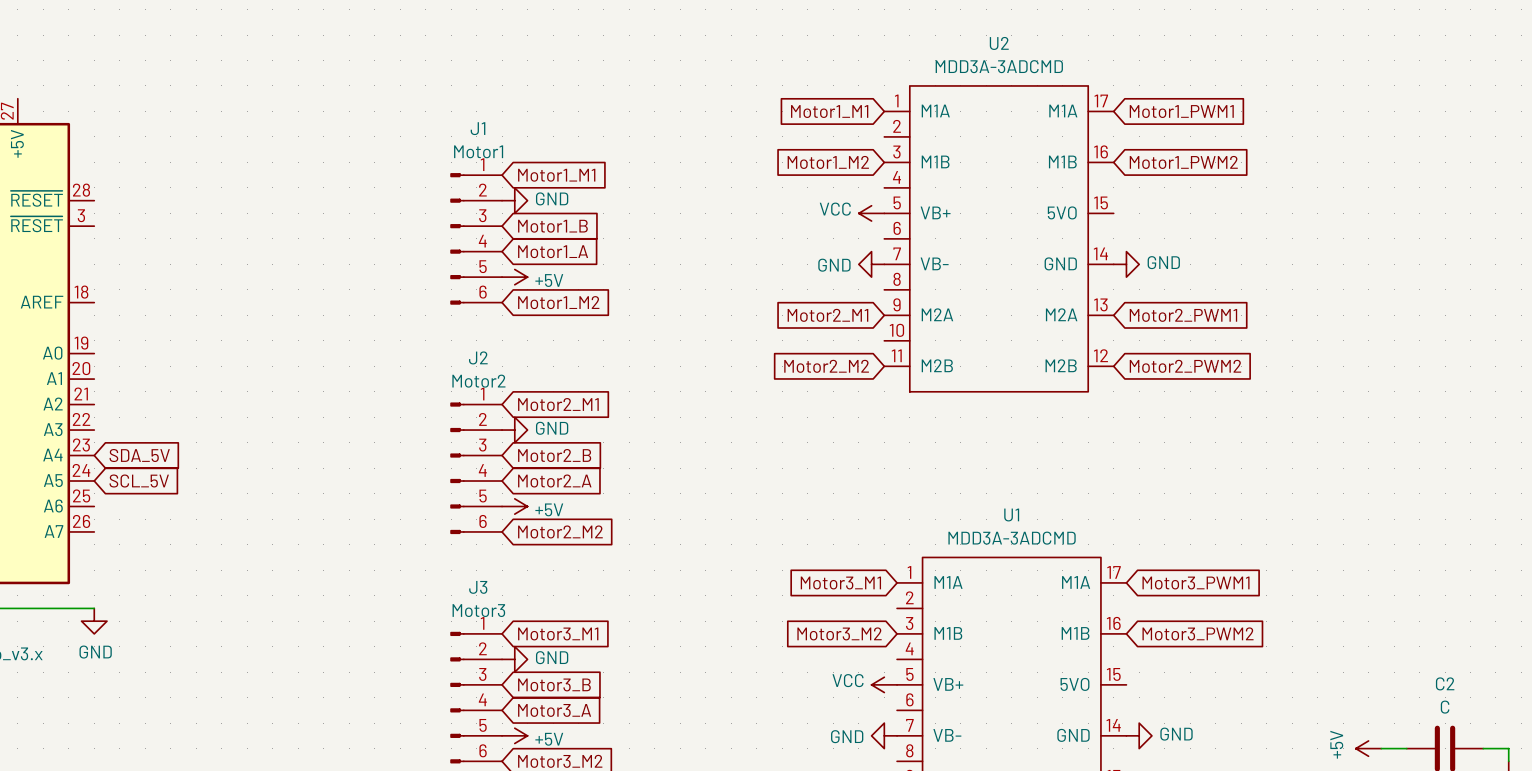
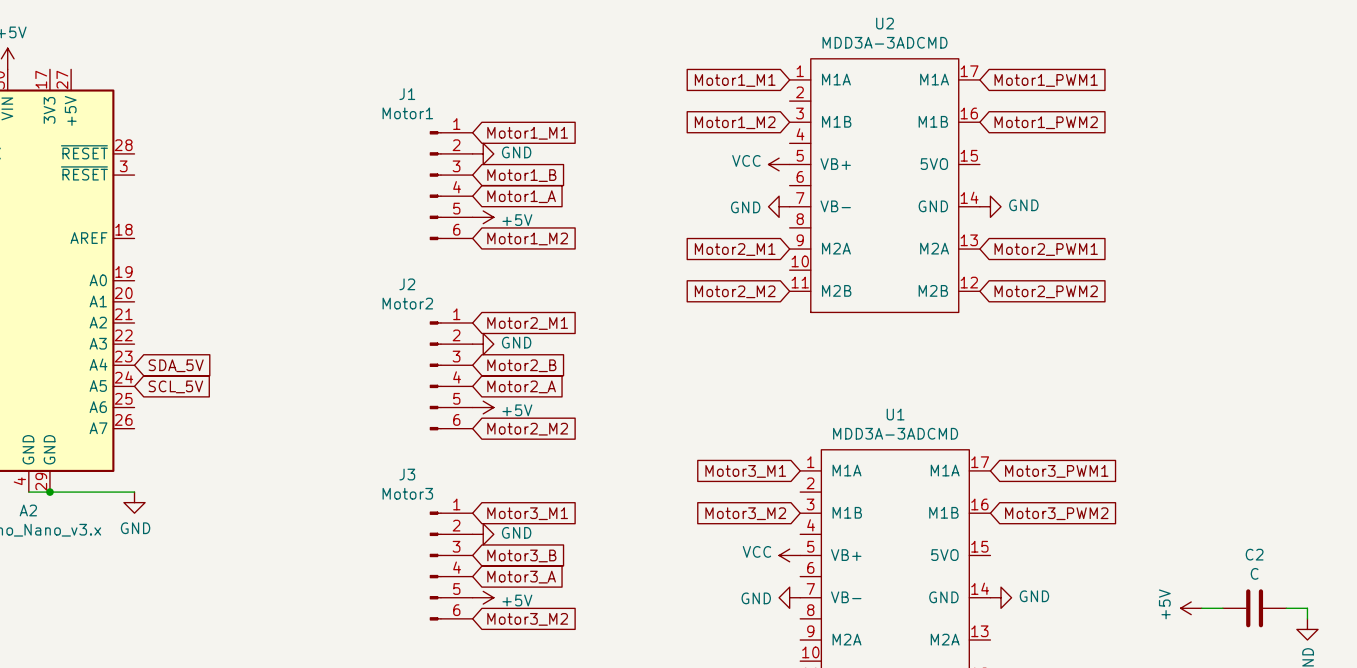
J1 name position: J1 (478, 128) -> J1 (407, 94)
J1 value position: Motor1 (478, 151) -> Motor1 (407, 113)
J2 name position: J2 (478, 357) -> J2 (407, 284)
J2 value position: Motor2 (478, 381) -> Motor2 (407, 303)
J3 name position: J3 (478, 587) -> J3 (407, 474)
J3 value position: Motor3 (478, 610) -> Motor3 (407, 493)

